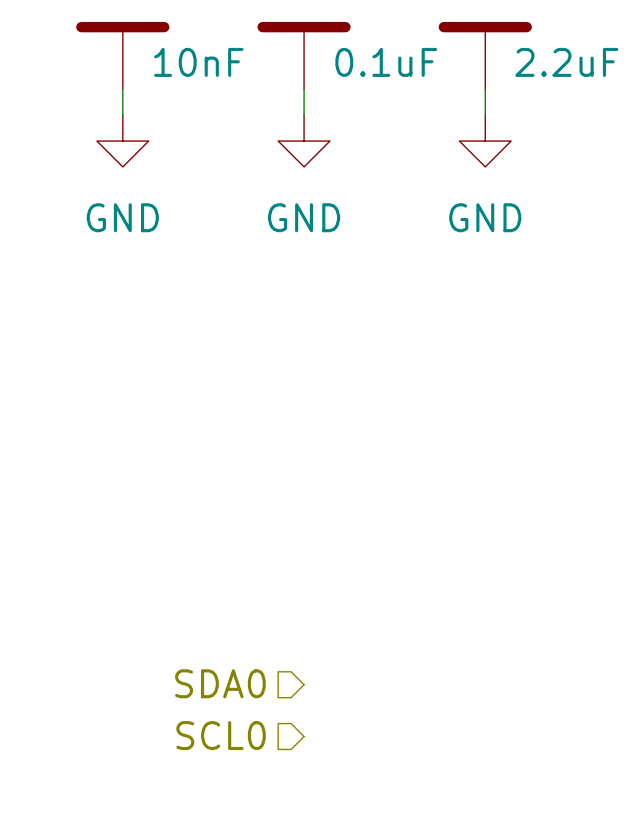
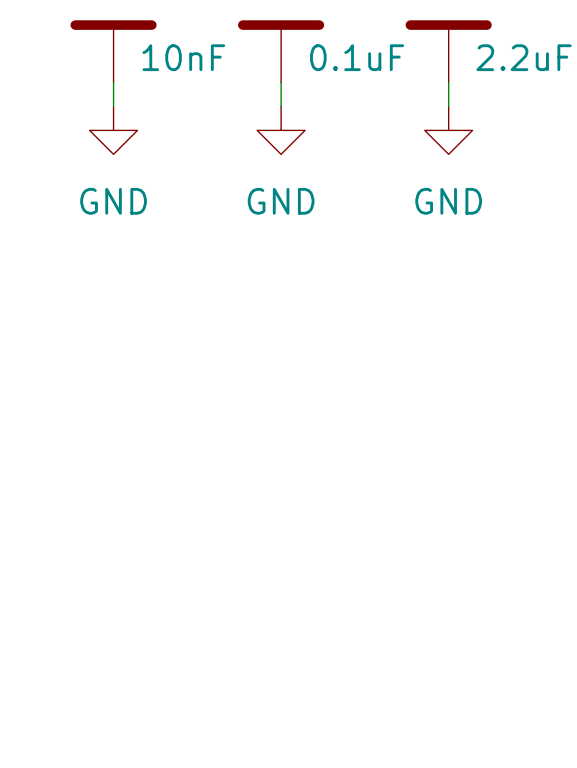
hierarchical label: SDA0 (220, 683) -> none
hierarchical label: SCL0 (221, 735) -> none

